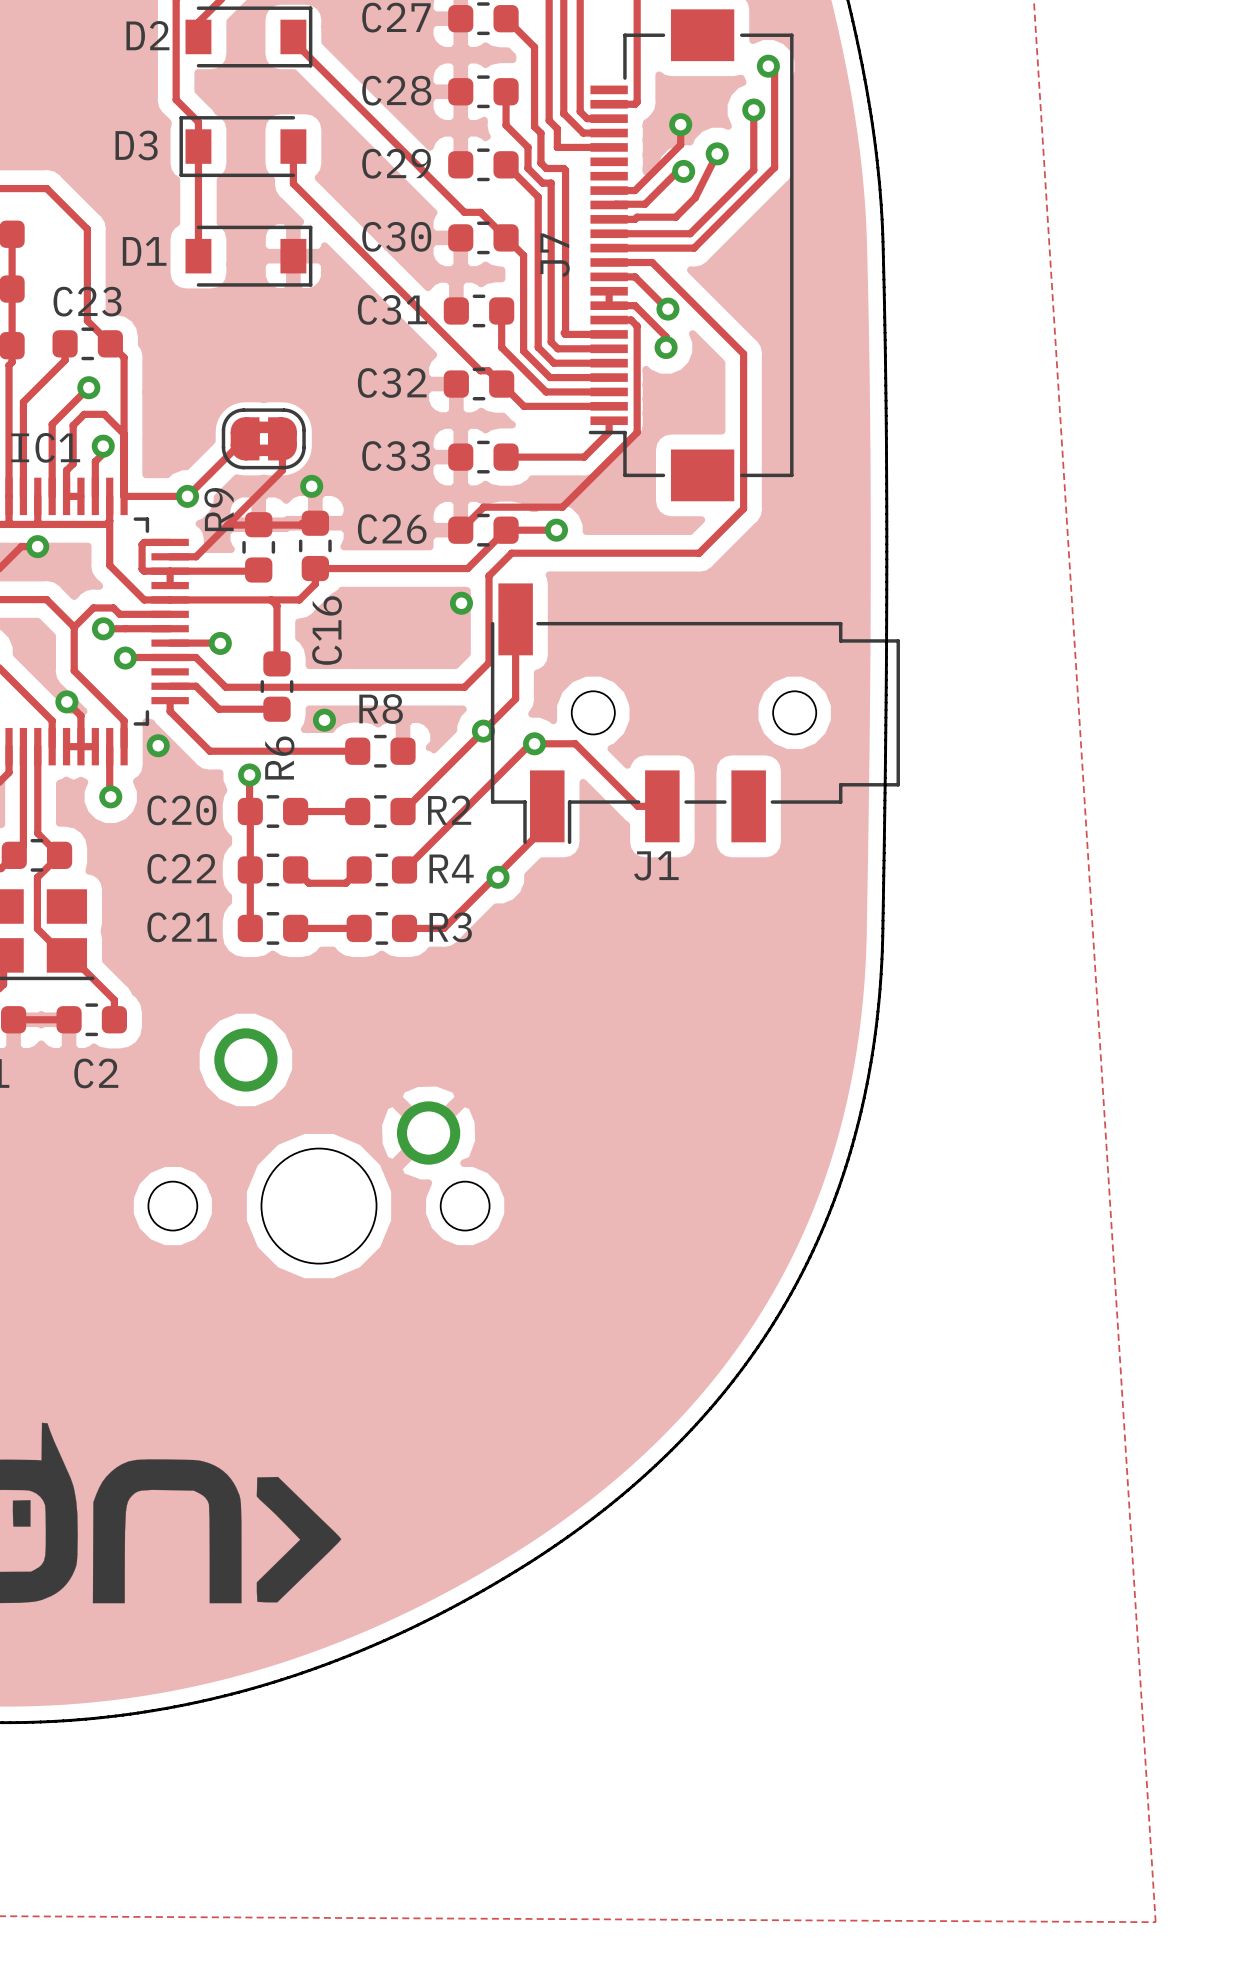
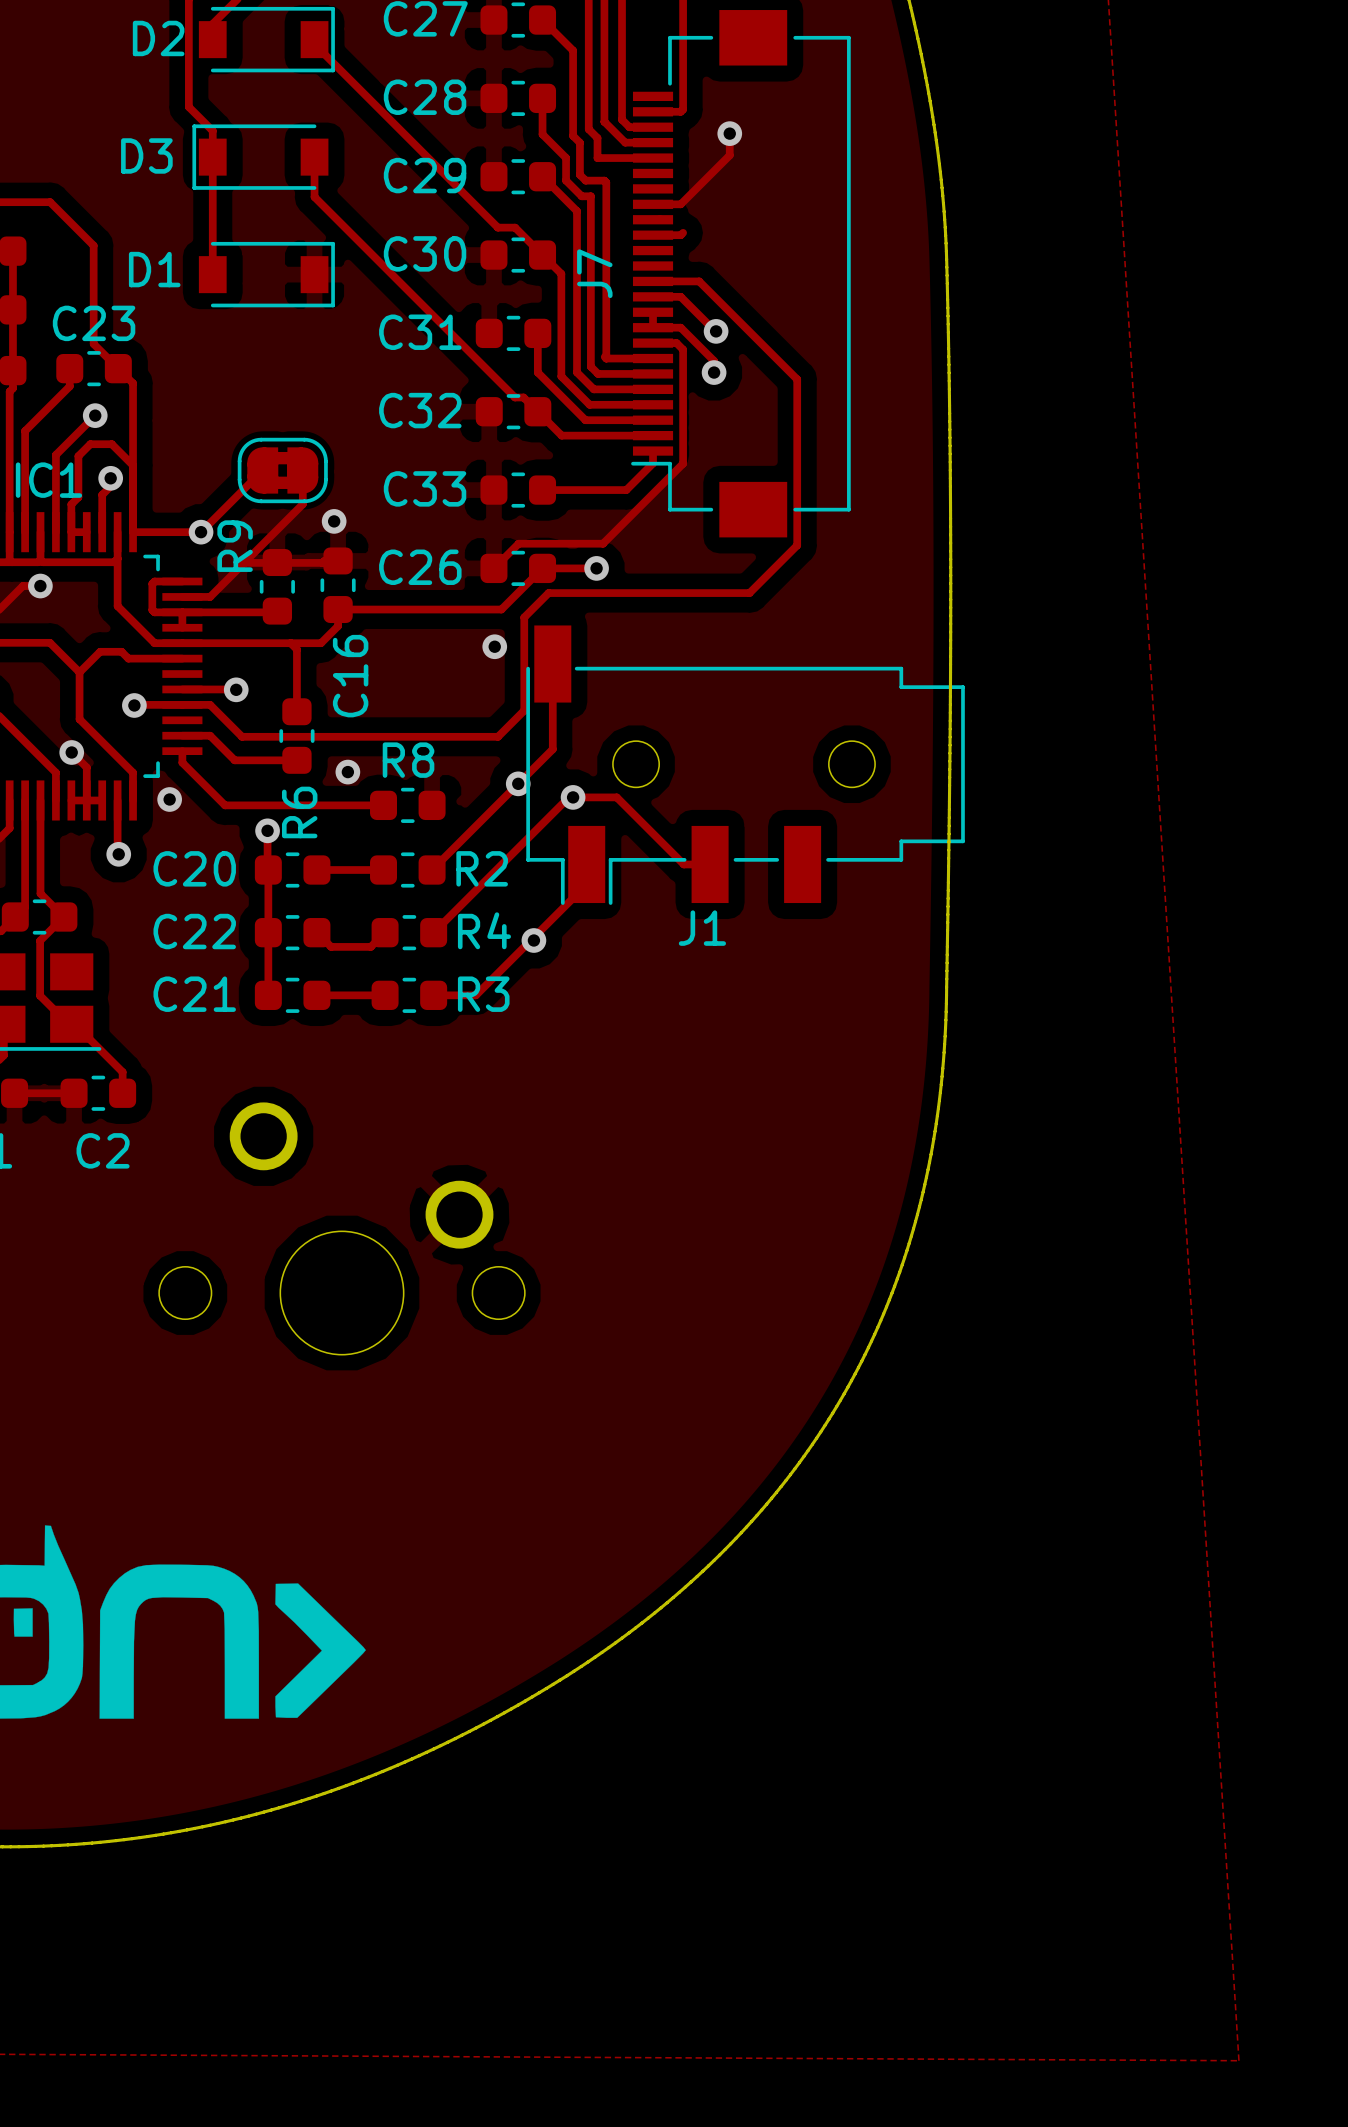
track: (768, 66) (774, 72) (774, 167) (694, 248) (609, 248) -> none
via: (768, 66) -> none
track: (753, 110) (753, 170) (690, 233) (609, 233) -> none
via: (753, 110) -> none
track: (717, 153) (695, 197) (675, 217) (637, 217) -> none
via: (717, 153) -> none
track: (683, 171) (677, 171) (644, 204) (615, 204) -> none
via: (683, 171) -> none
track: (103, 628) (170, 628) -> none
via: (103, 628) -> none

